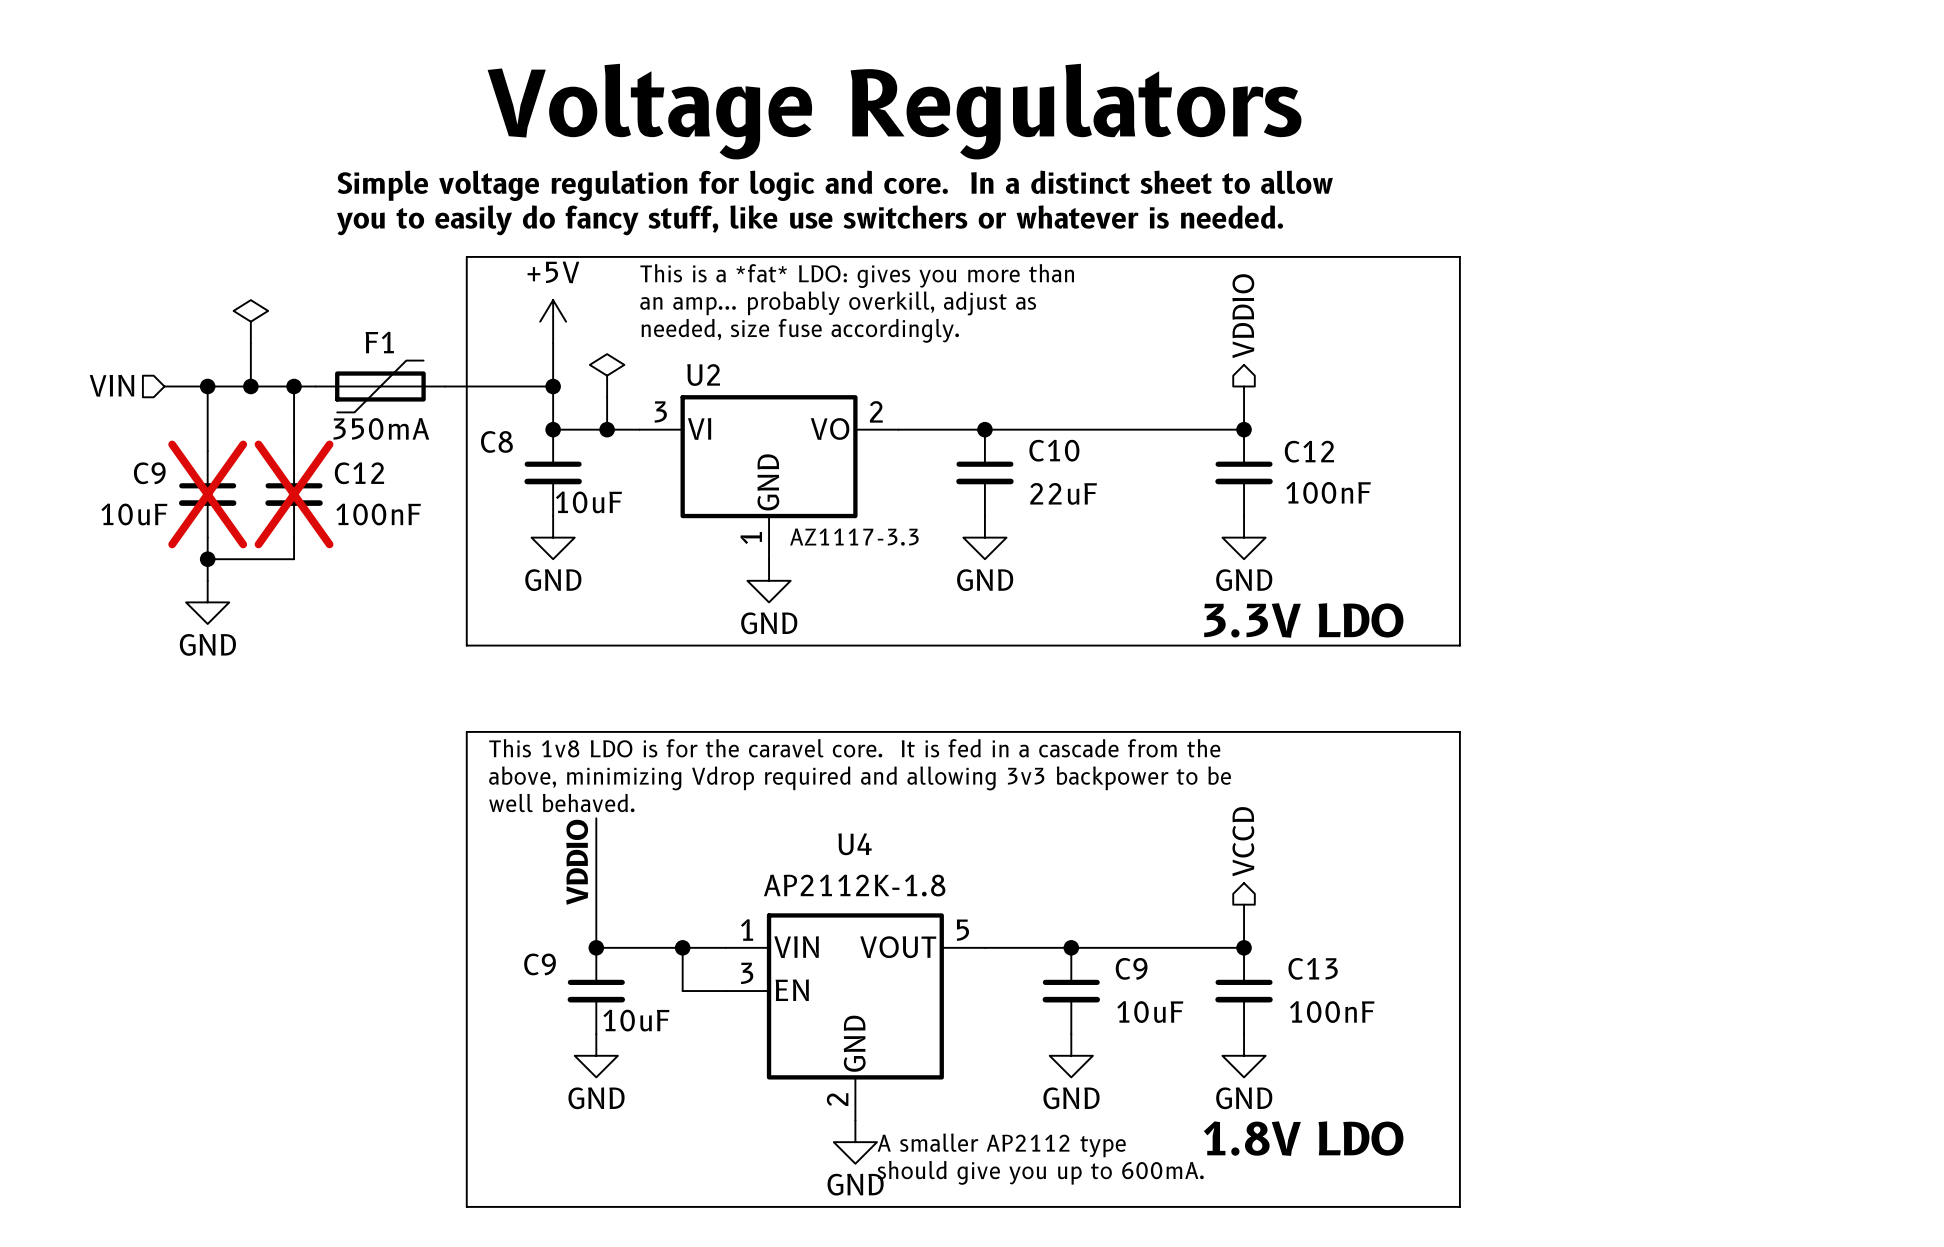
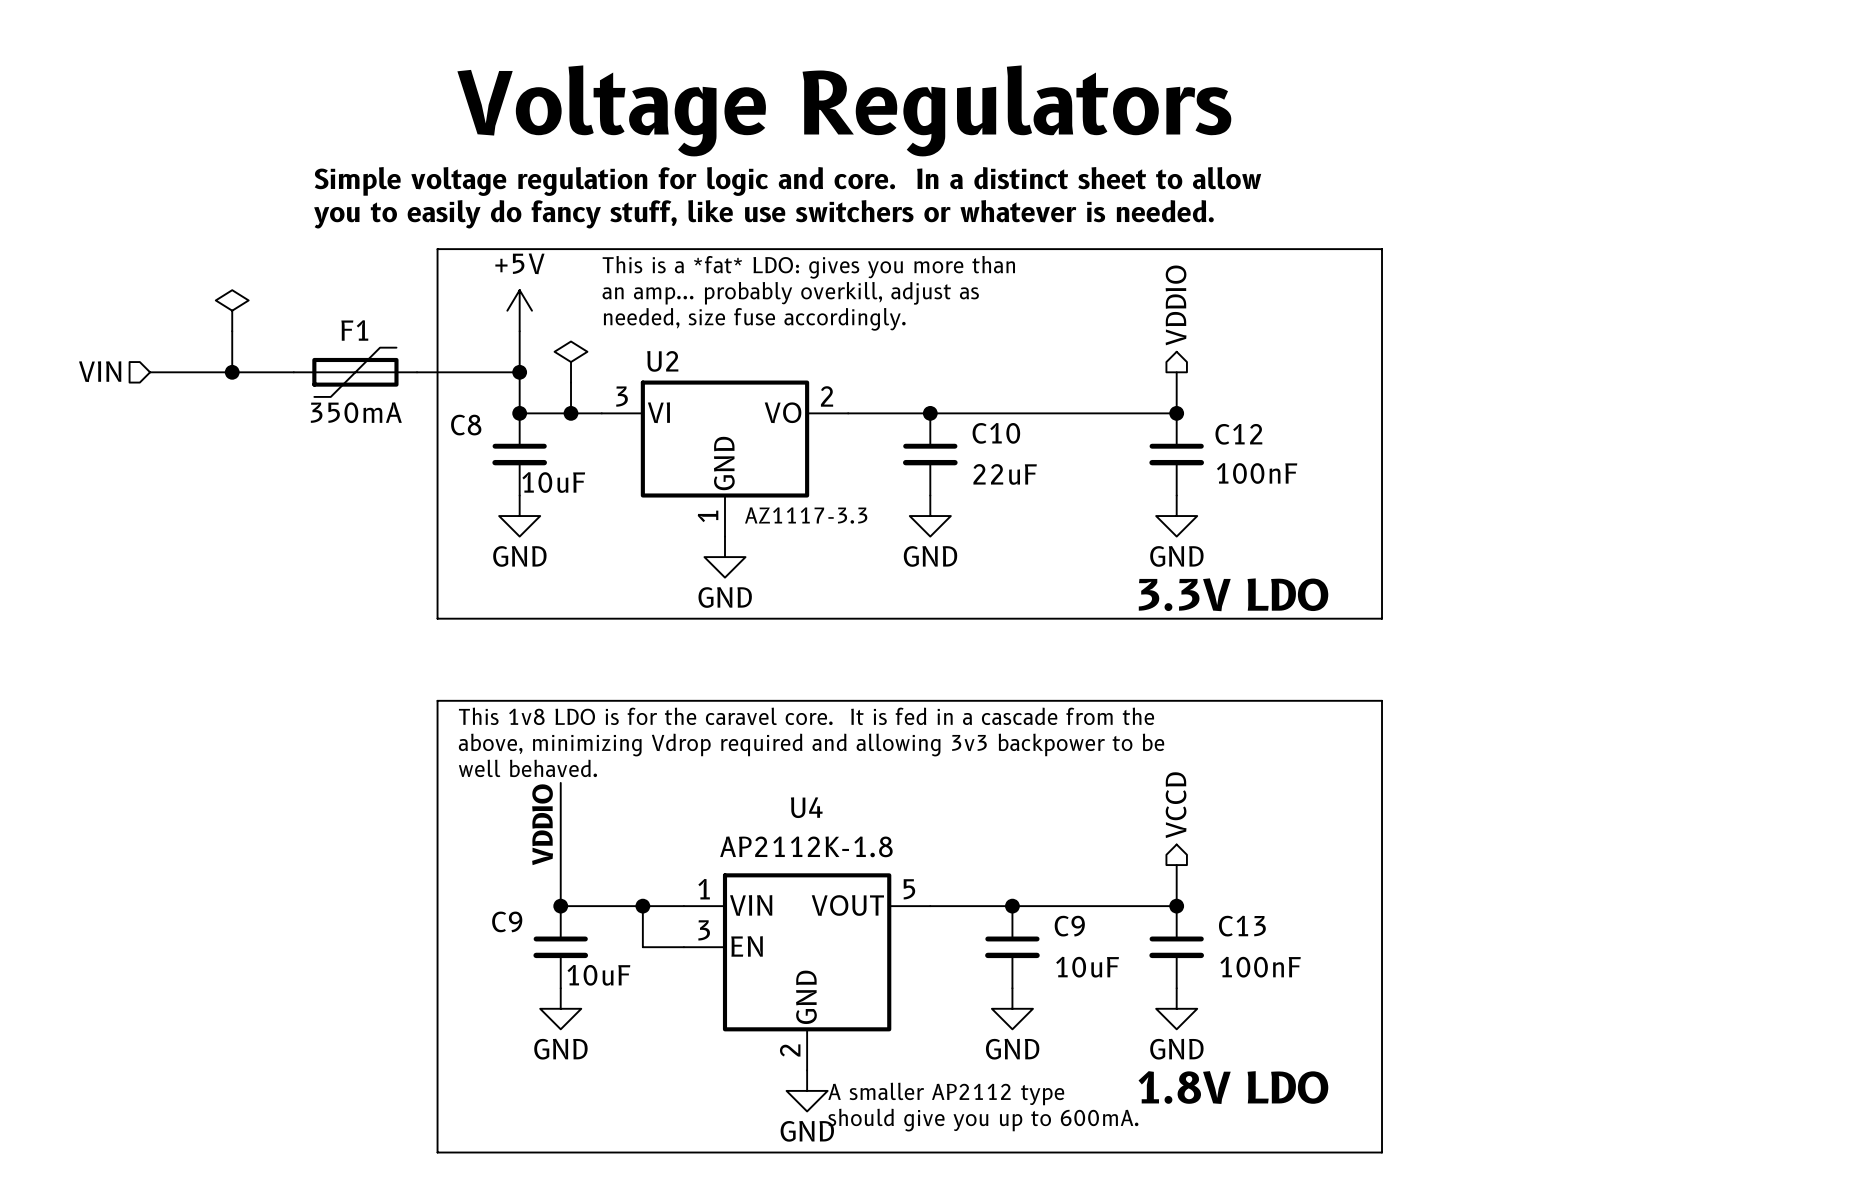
wire: (207, 386) (207, 451) -> none
junction: (207, 386) -> none
wire: (294, 386) (294, 451) -> none
junction: (294, 386) -> none
C9: 10uF (207, 494) -> none
C12: 100nF (294, 494) -> none
wire: (207, 537) (207, 580) -> none
wire: (294, 537) (294, 559) (207, 559) -> none
junction: (207, 559) -> none
power symbol: GND (207, 602) -> none

